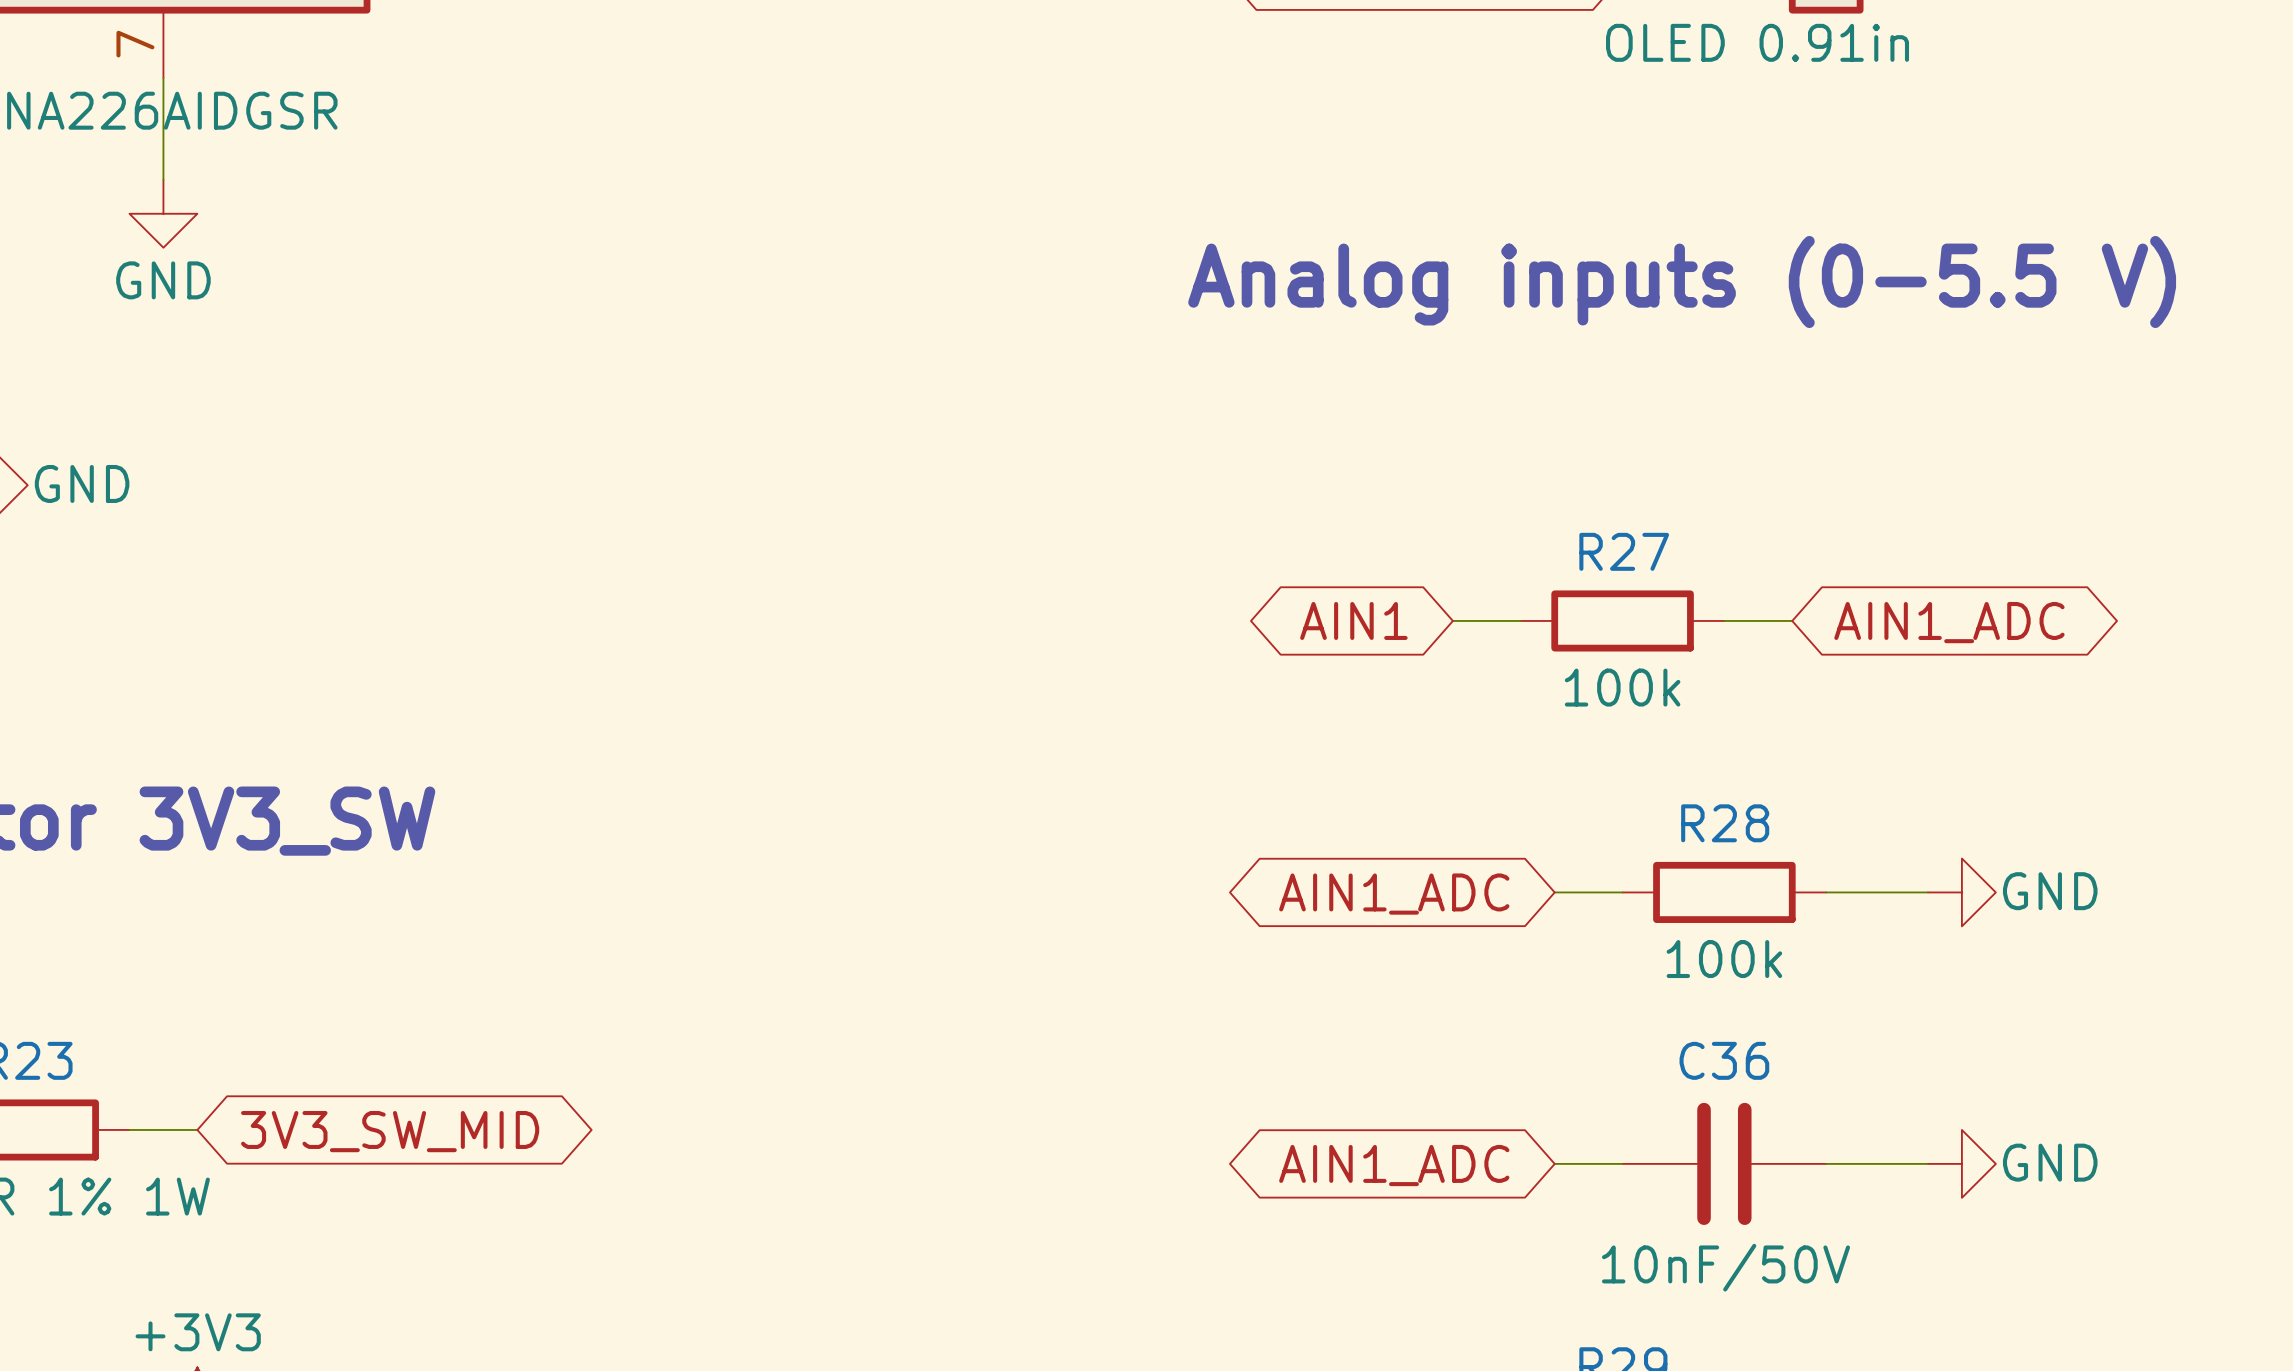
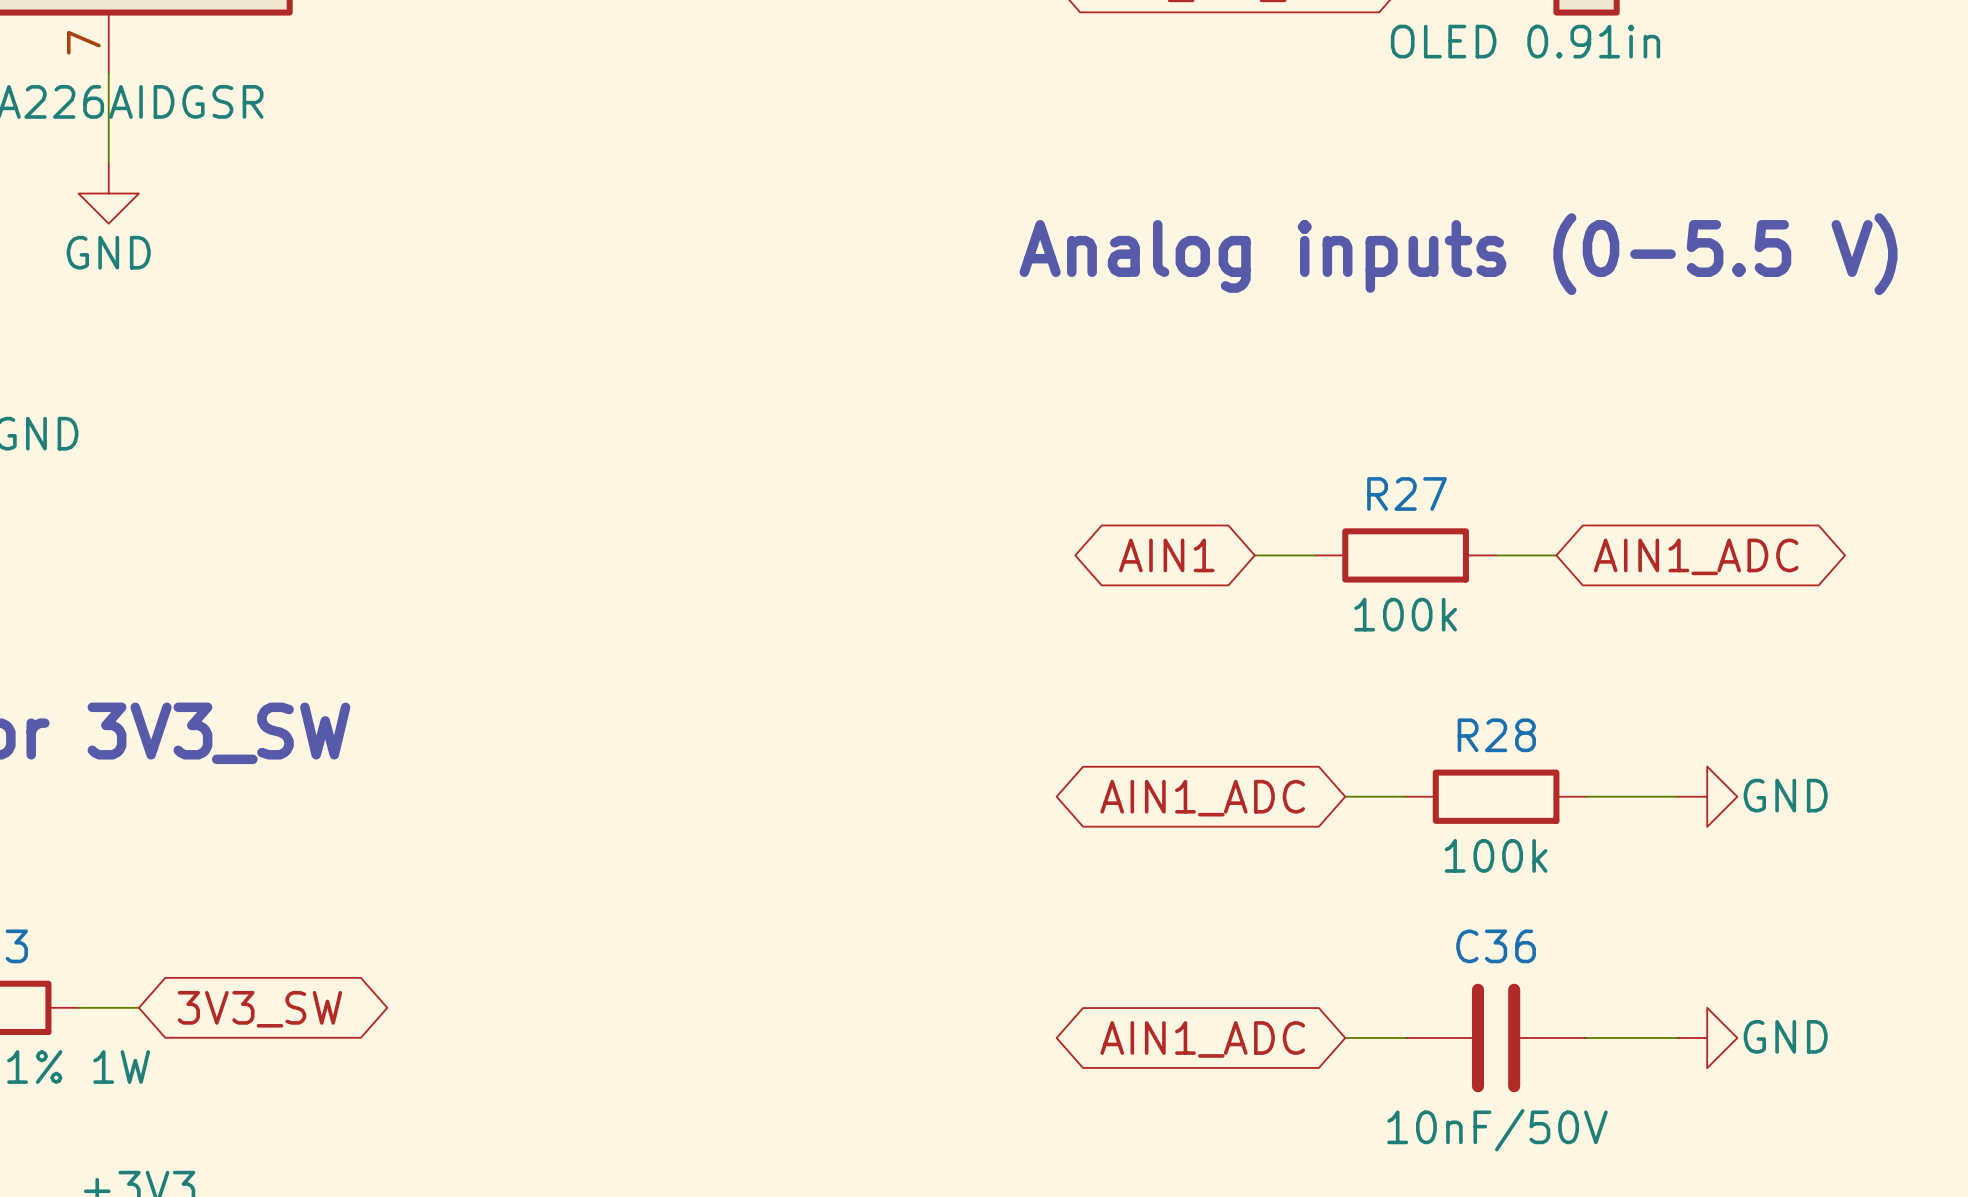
global label: 3V3_SW_MID (390, 1131) -> 3V3_SW (259, 1009)

